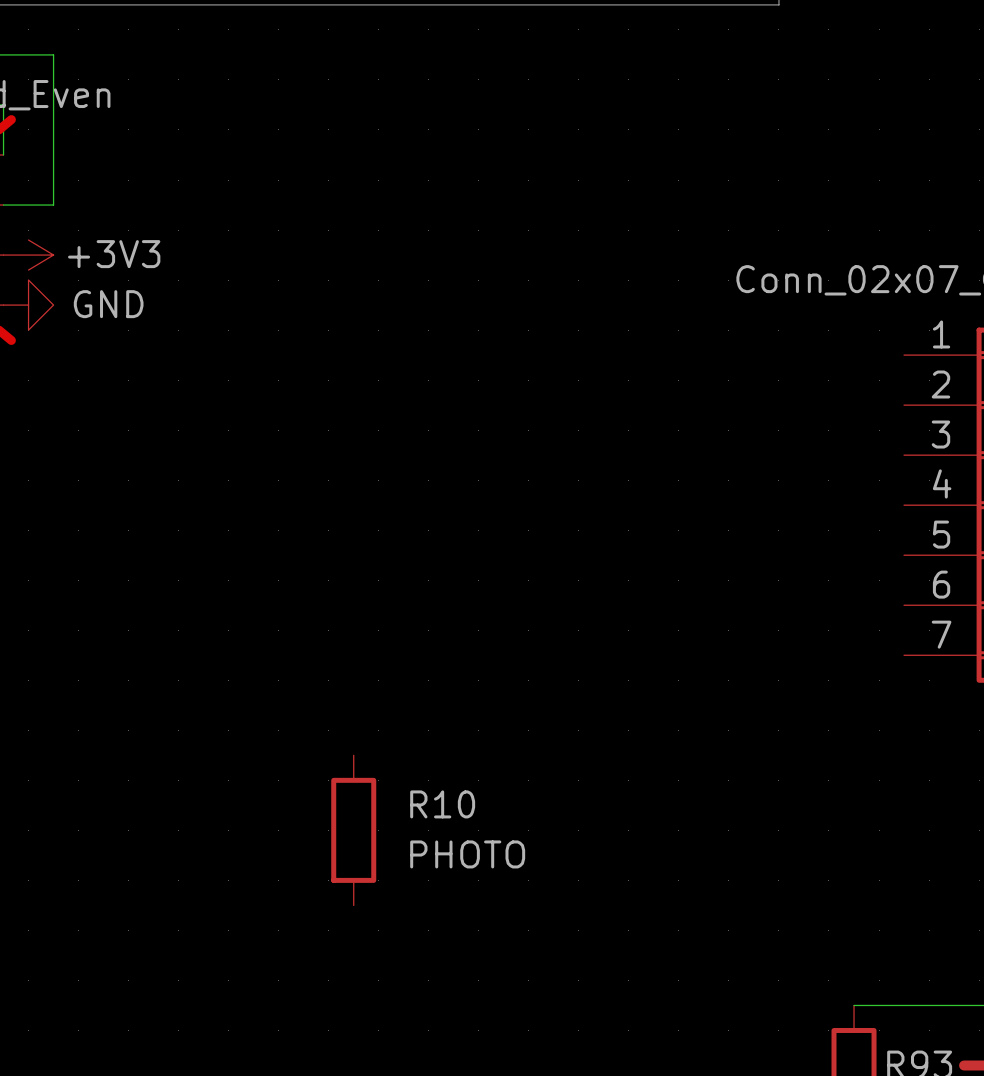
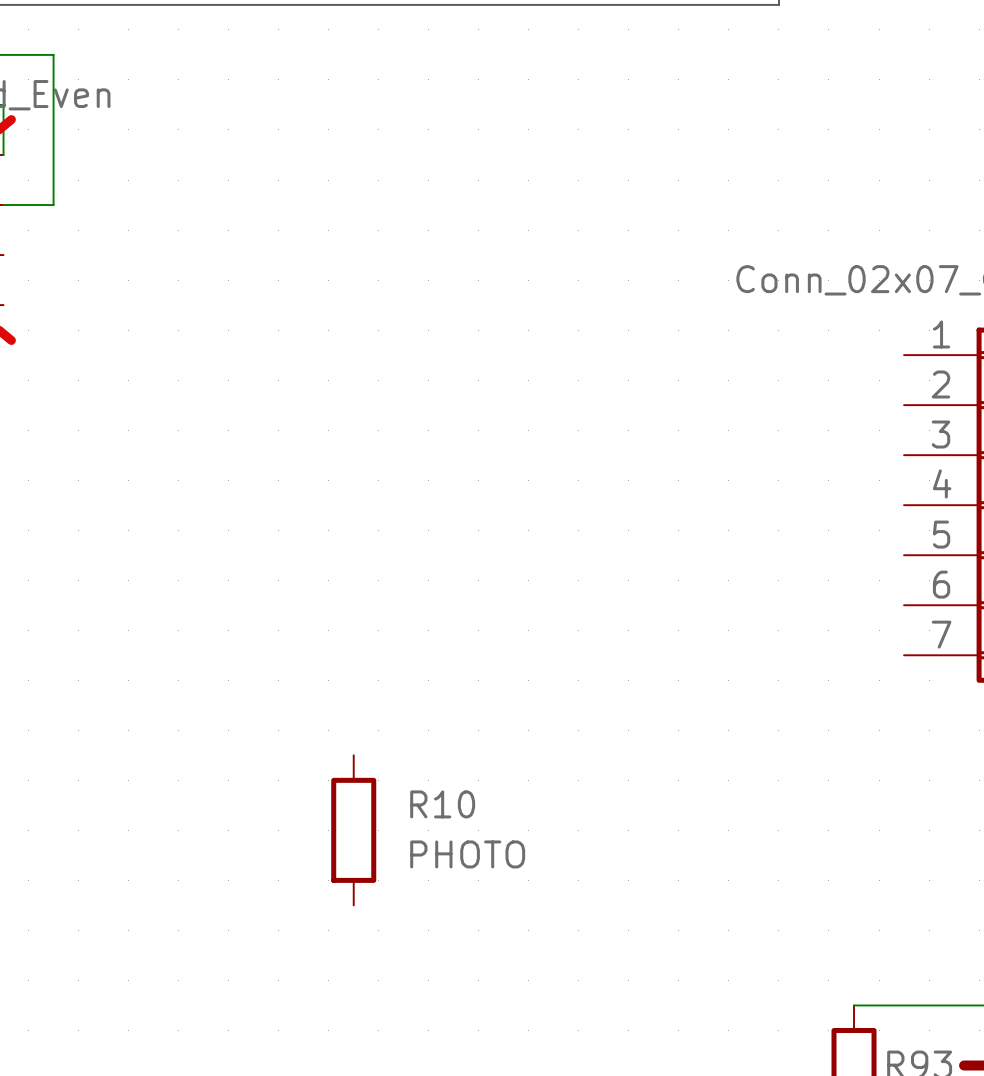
power symbol: +3V3 (28, 255) -> none
power symbol: GND (28, 305) -> none

